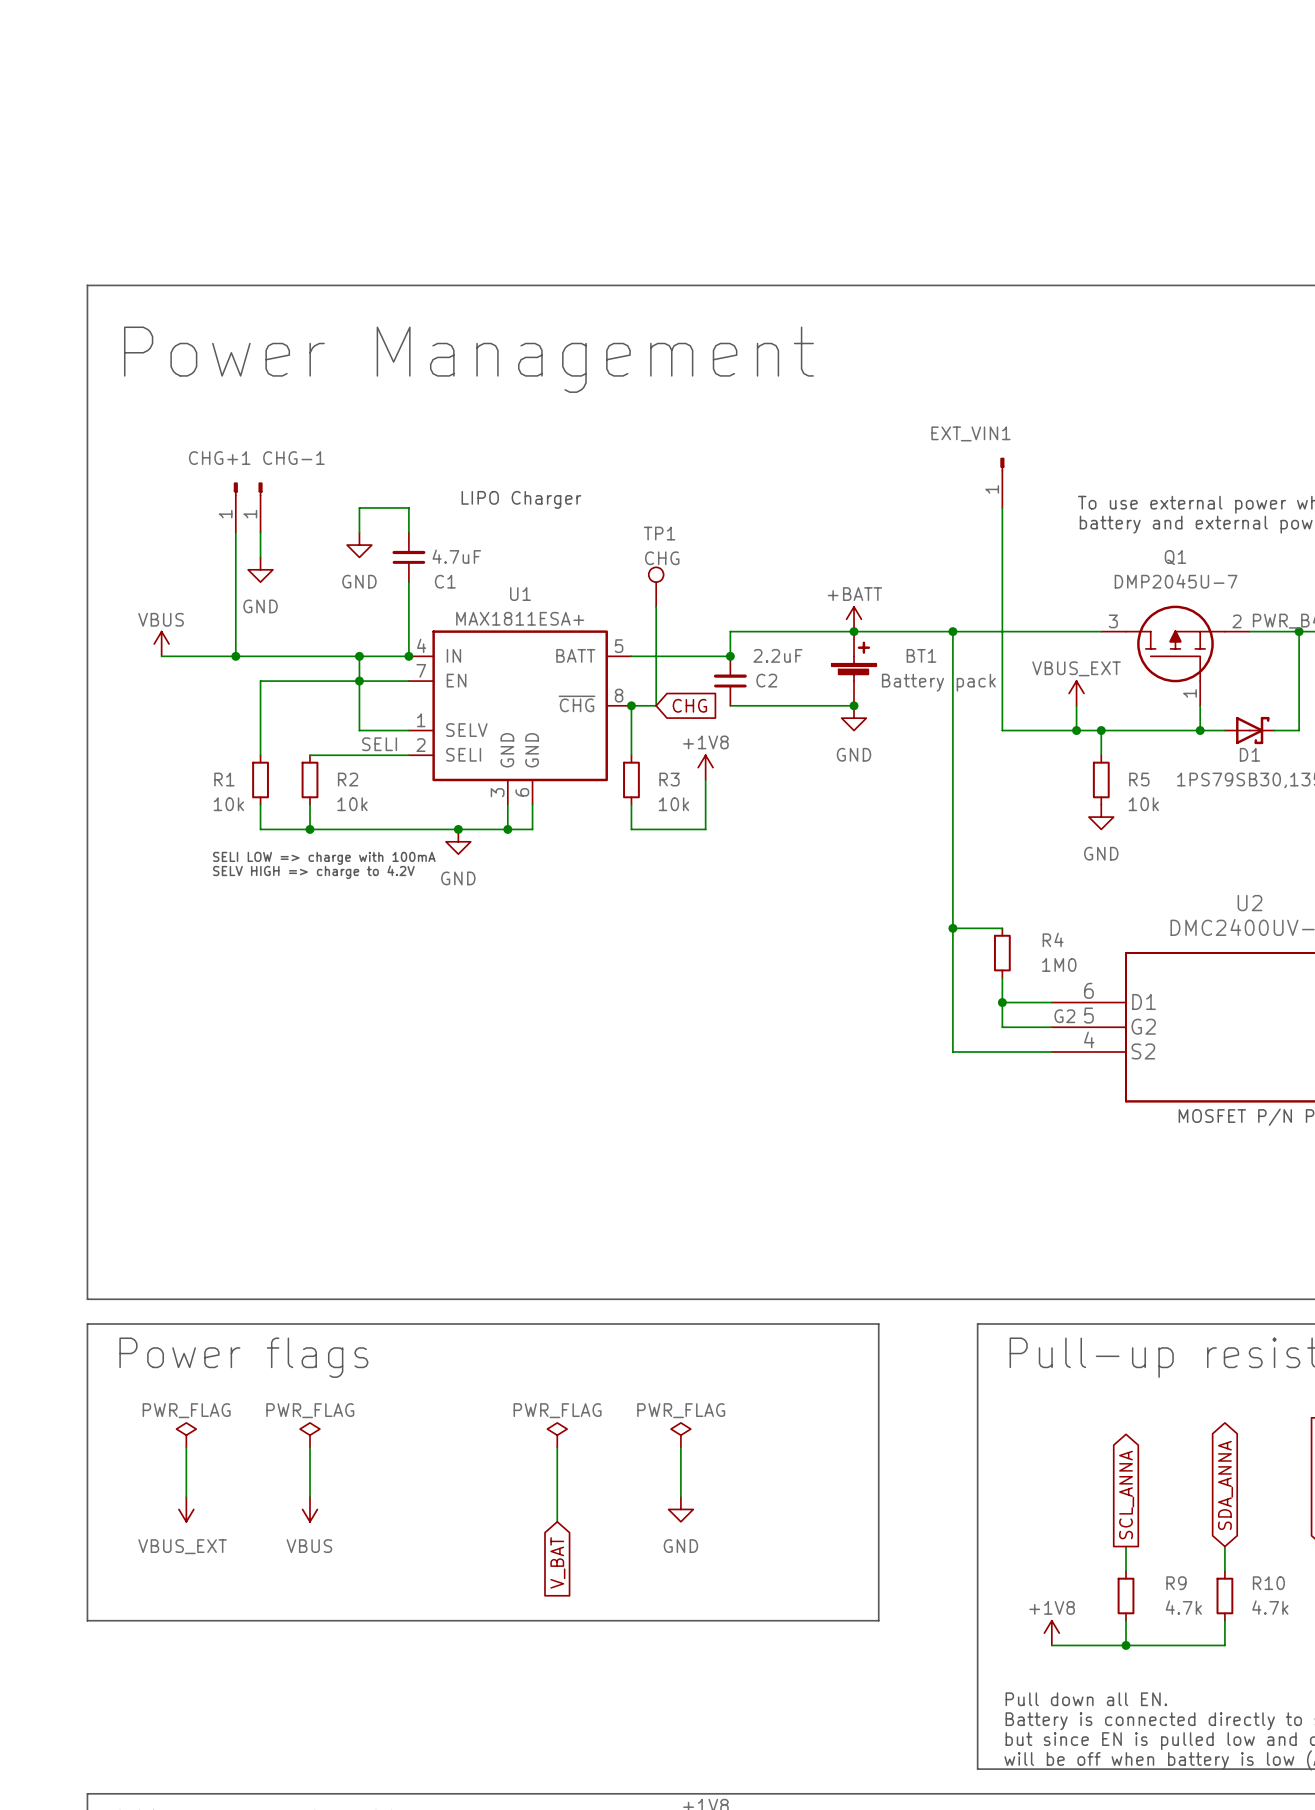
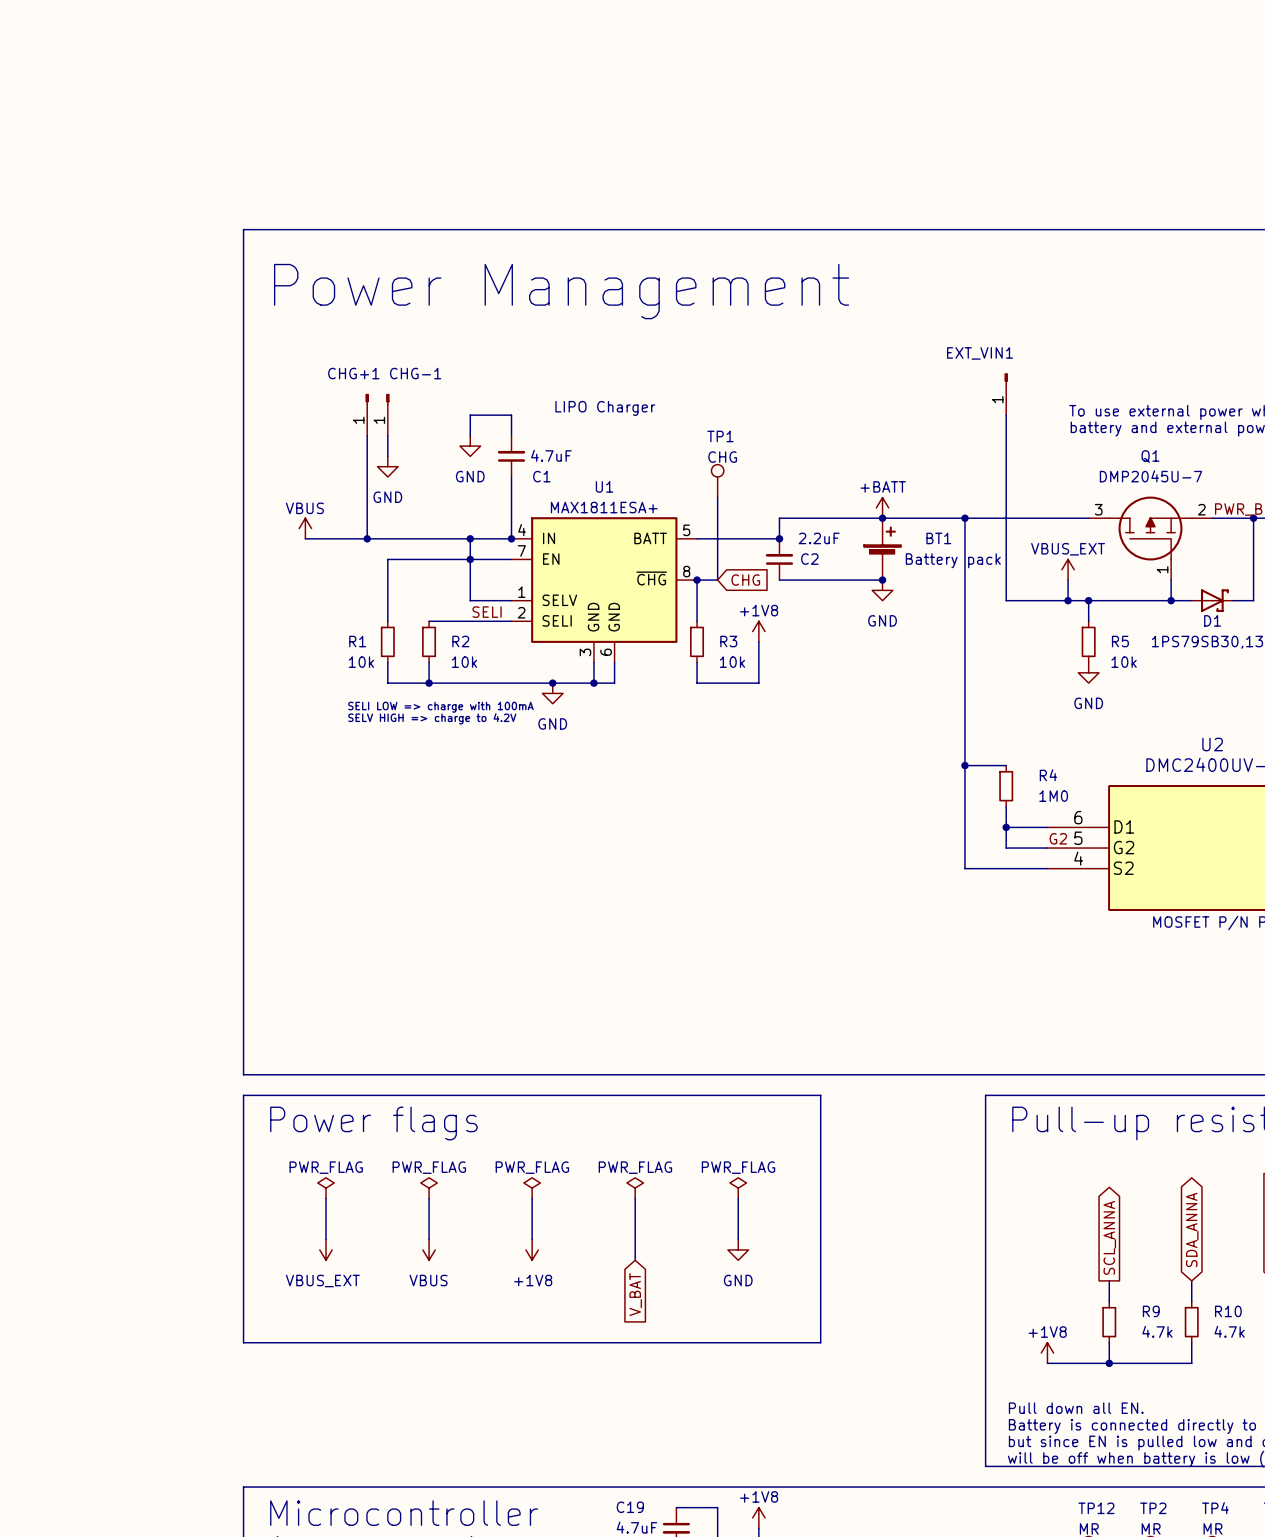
line: (779, 1323) (878, 1323) (878, 1620) (779, 1620) -> (820, 1095) (820, 1342)
power symbol: none -> PWR_FLAG (532, 1188)
wire: none -> (532, 1198) (532, 1239)
power symbol: none -> +1V8 (532, 1249)

